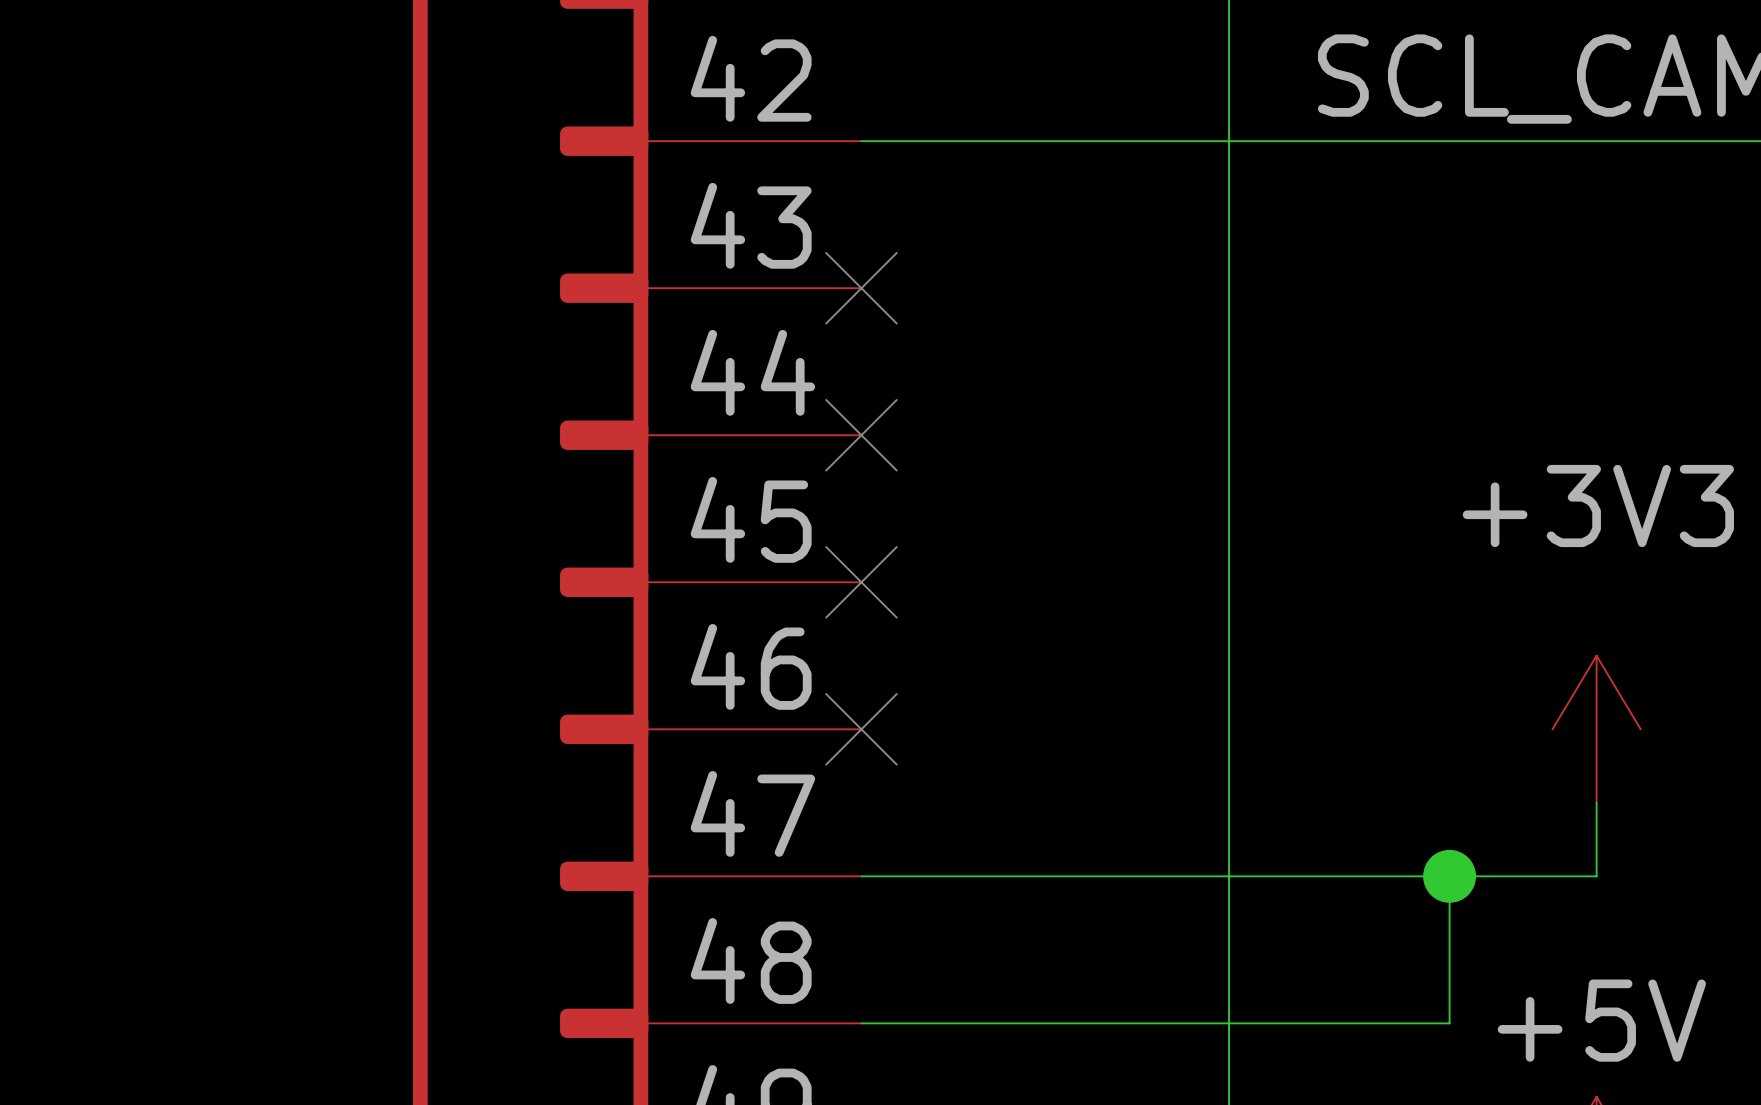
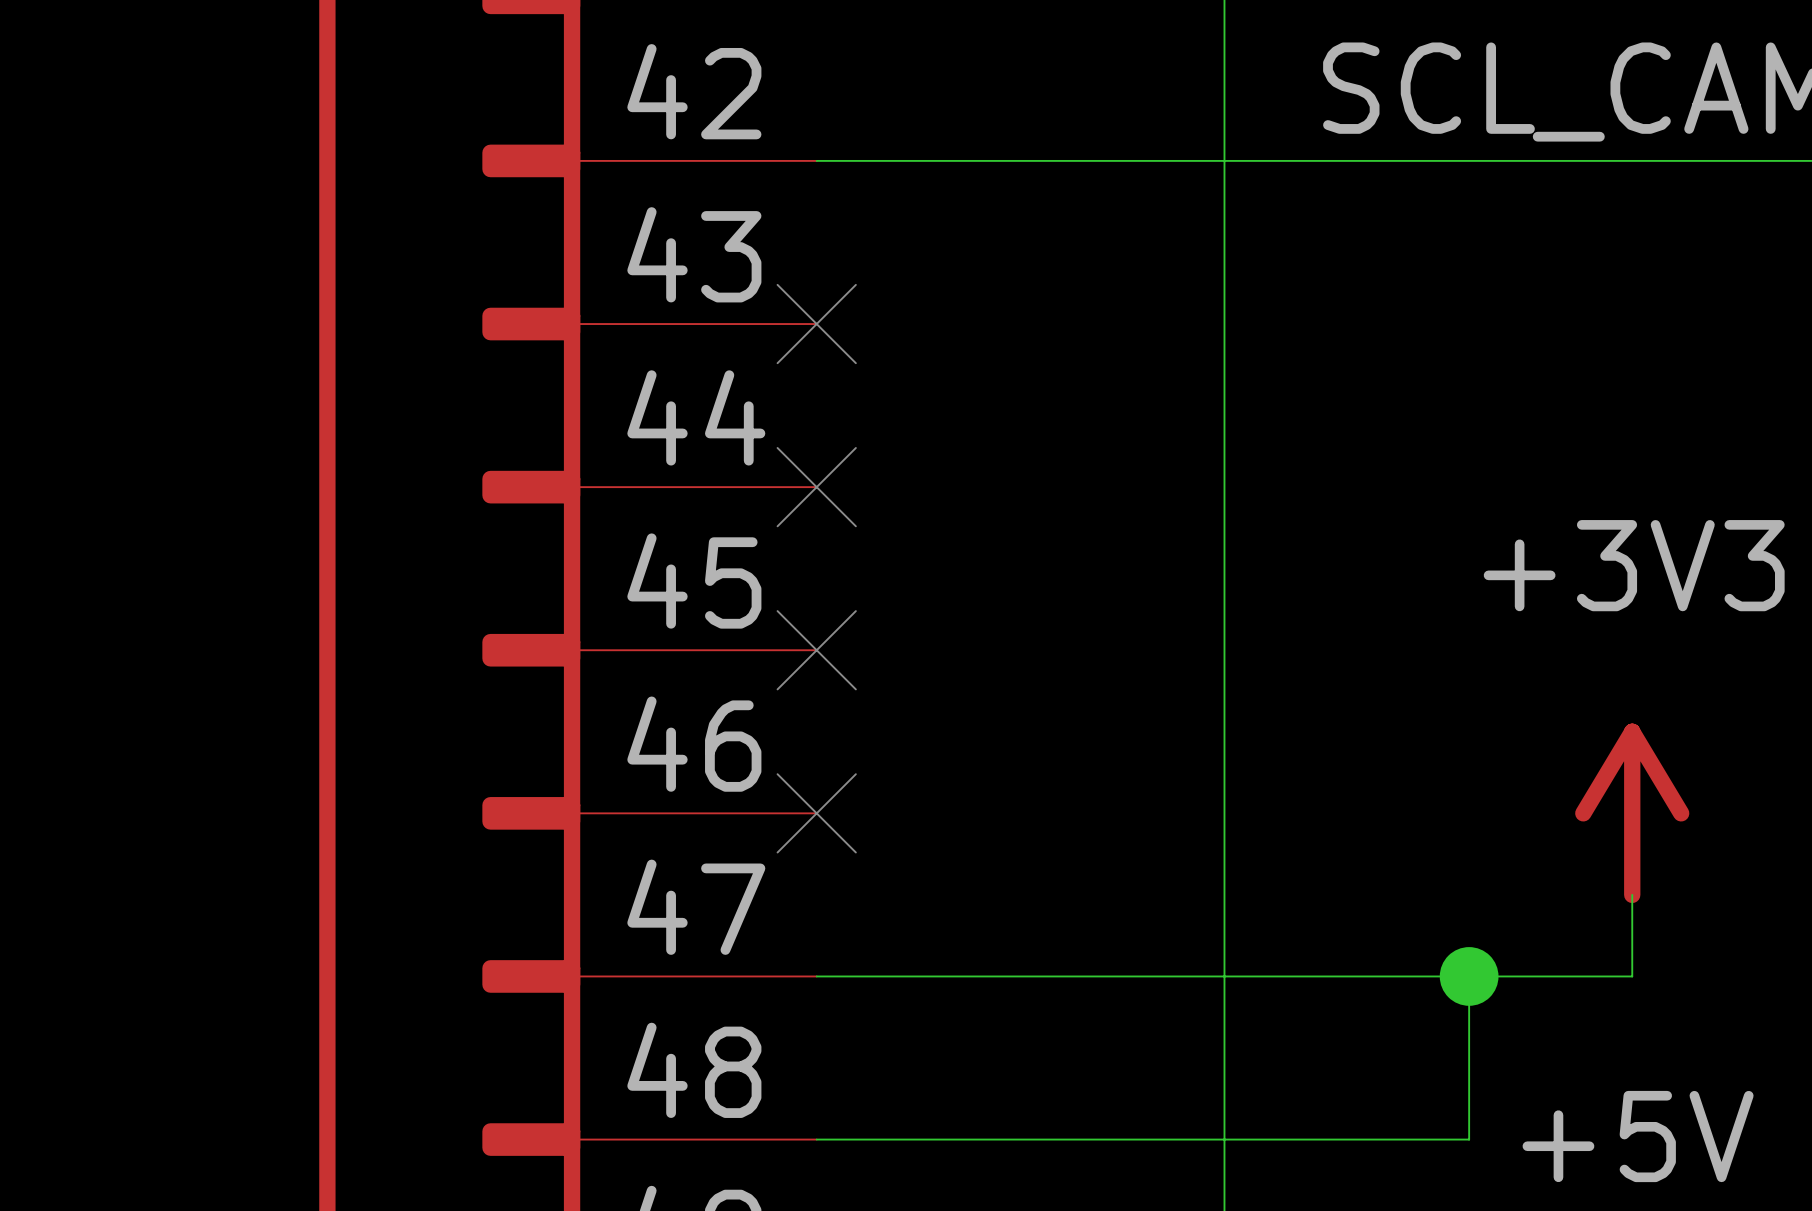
power symbol shape: [1552, 655, 1641, 803] -> [1575, 723, 1690, 904]

